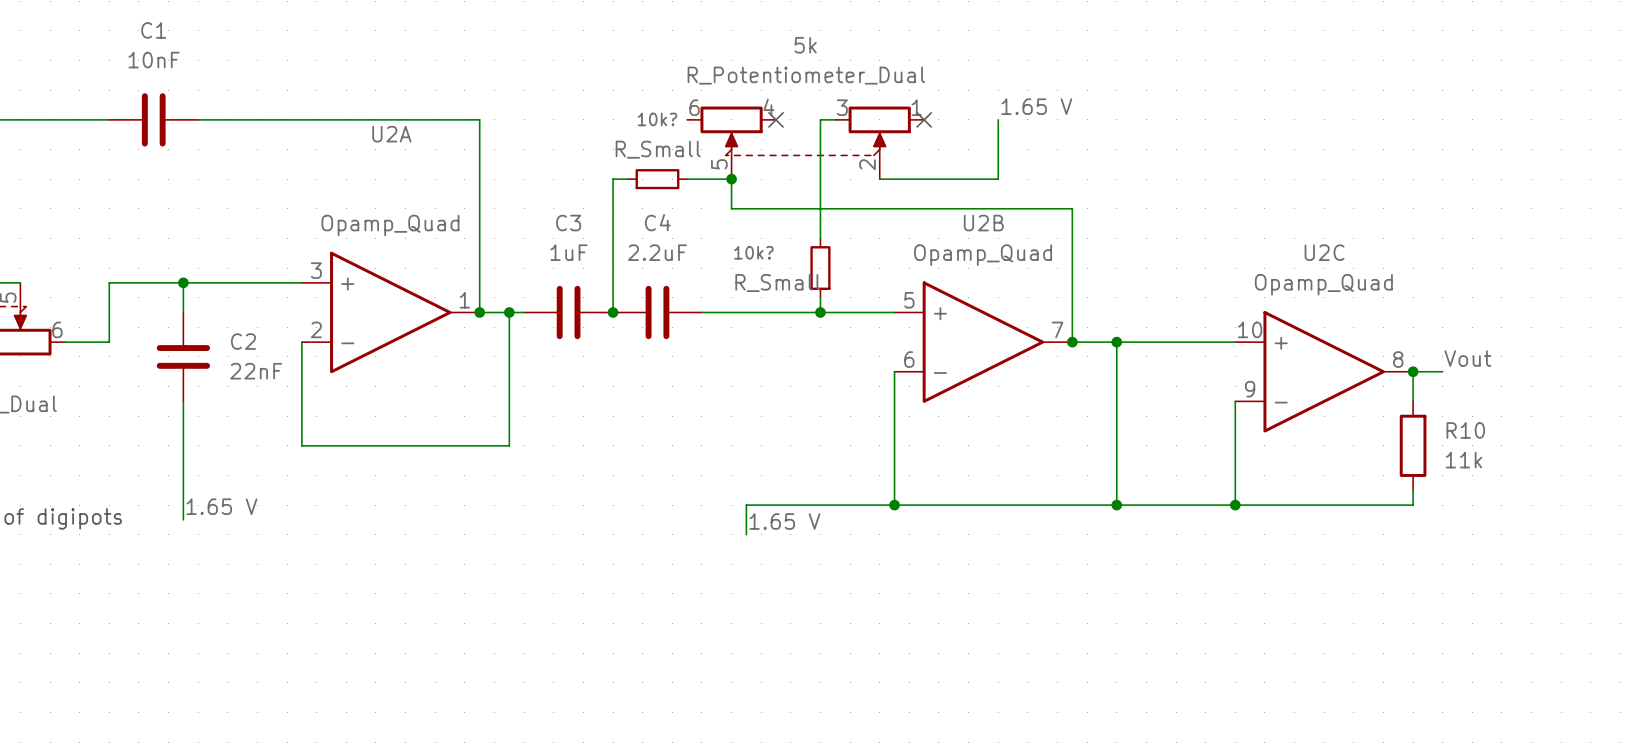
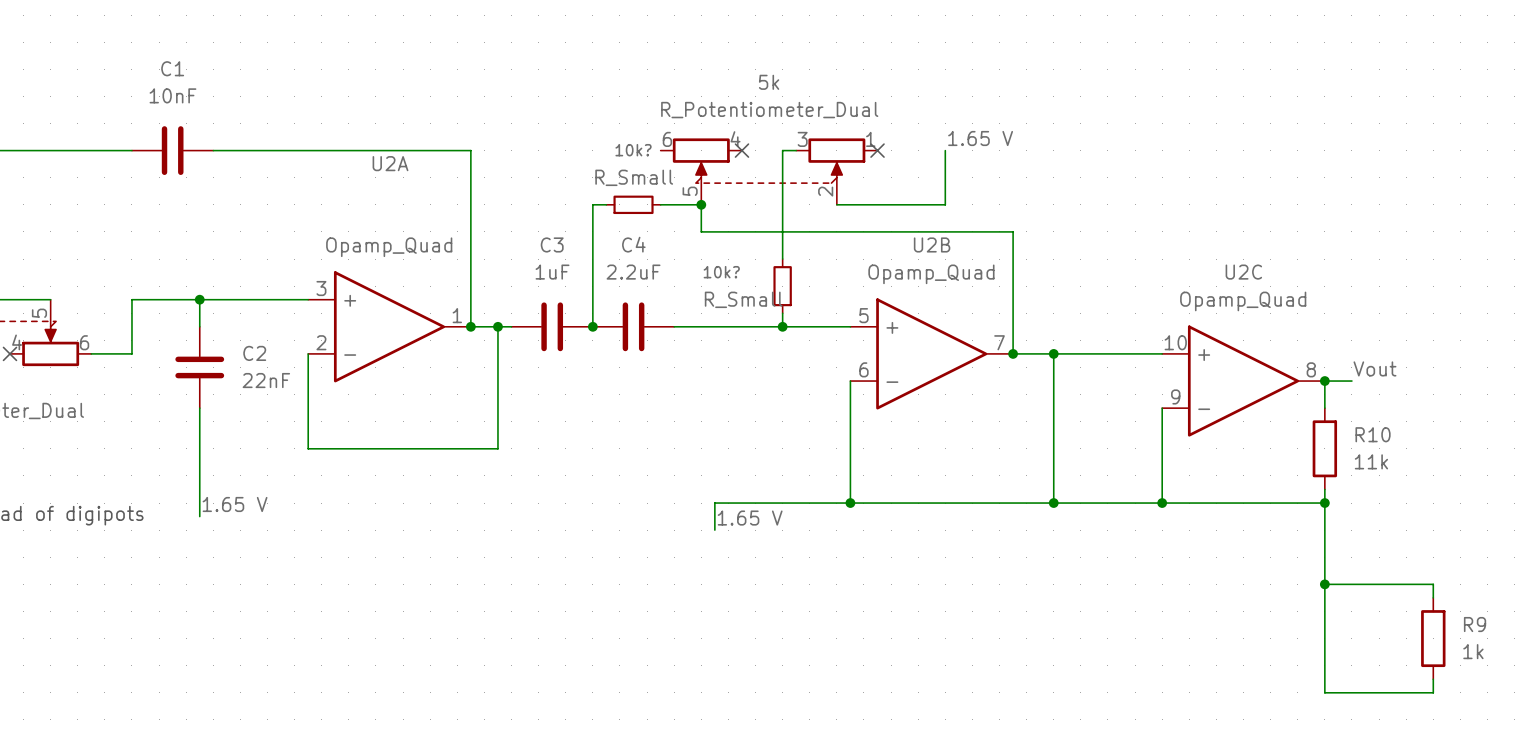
wire: none -> (1324, 503) (1324, 692) (1433, 692) (1433, 679)
junction: none -> (1324, 503)
wire: none -> (1324, 584) (1433, 584) (1433, 597)
junction: none -> (1324, 584)
R9: none -> 1k (1433, 638)

